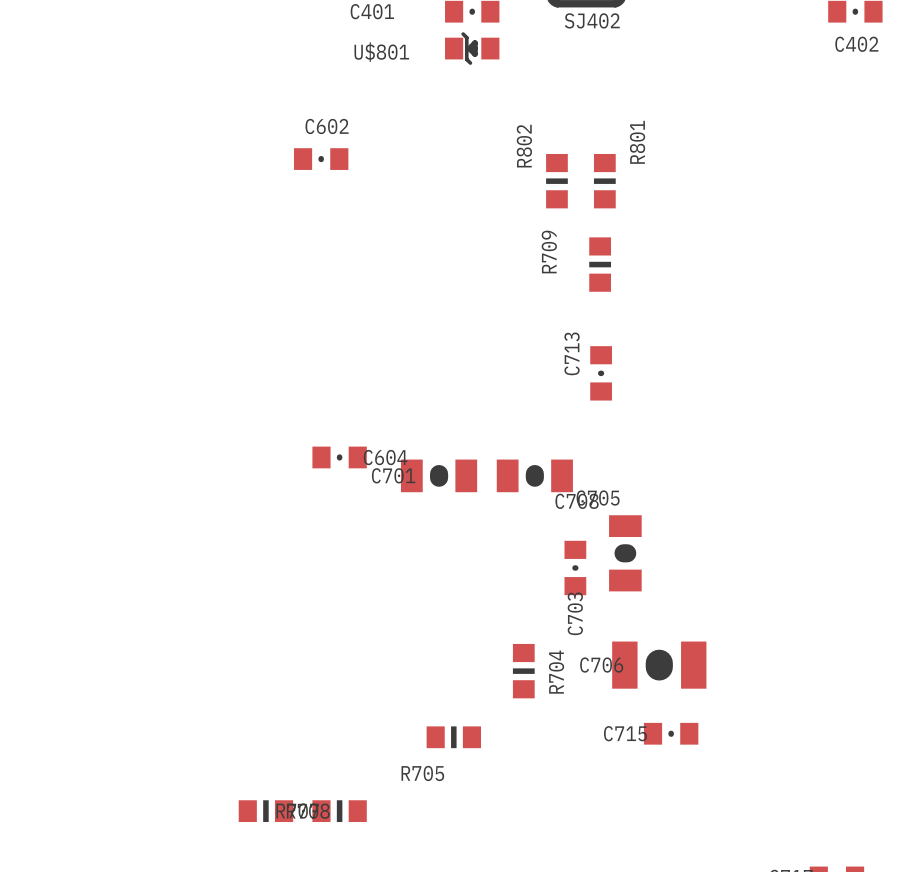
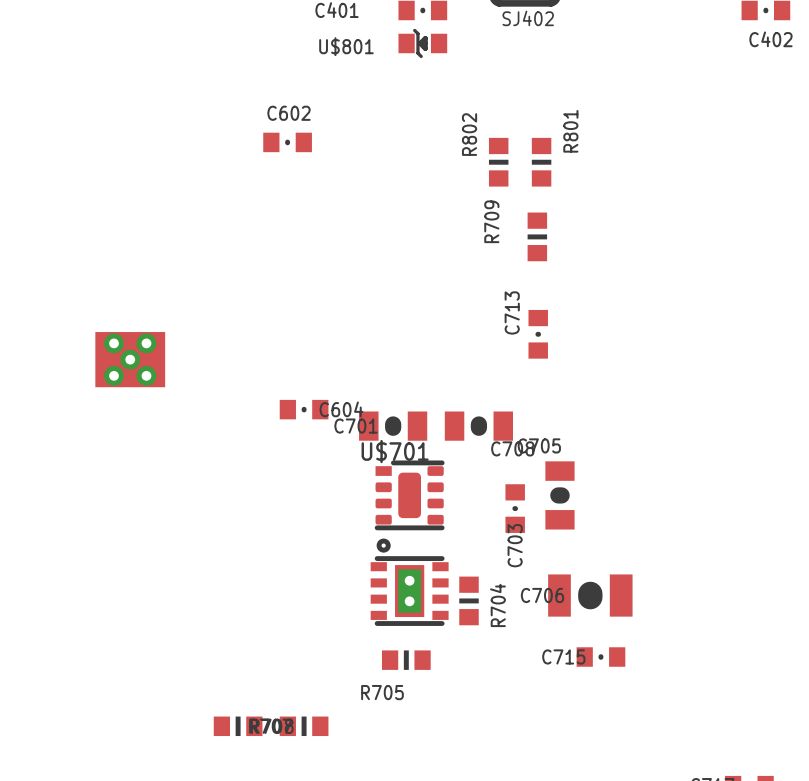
part: none -> (130, 359)
U$701: none -> (409, 495)
part: none -> (409, 582)

